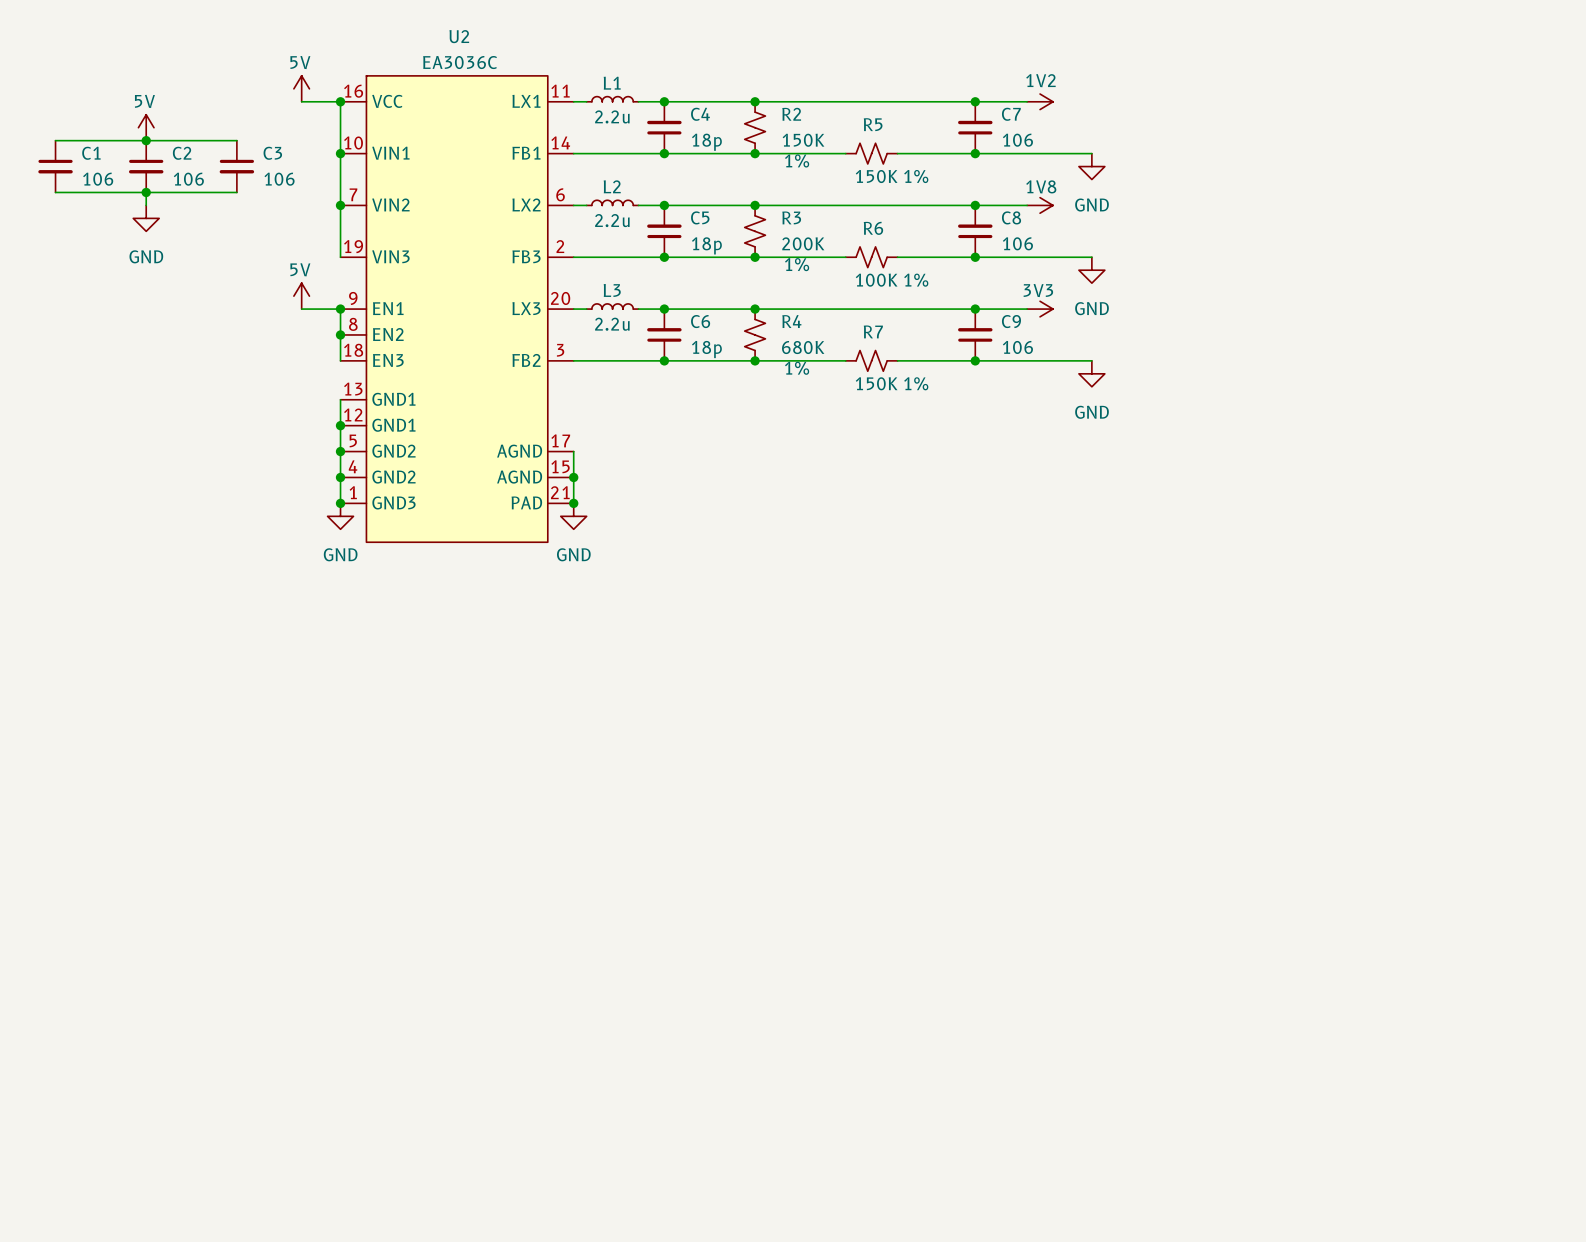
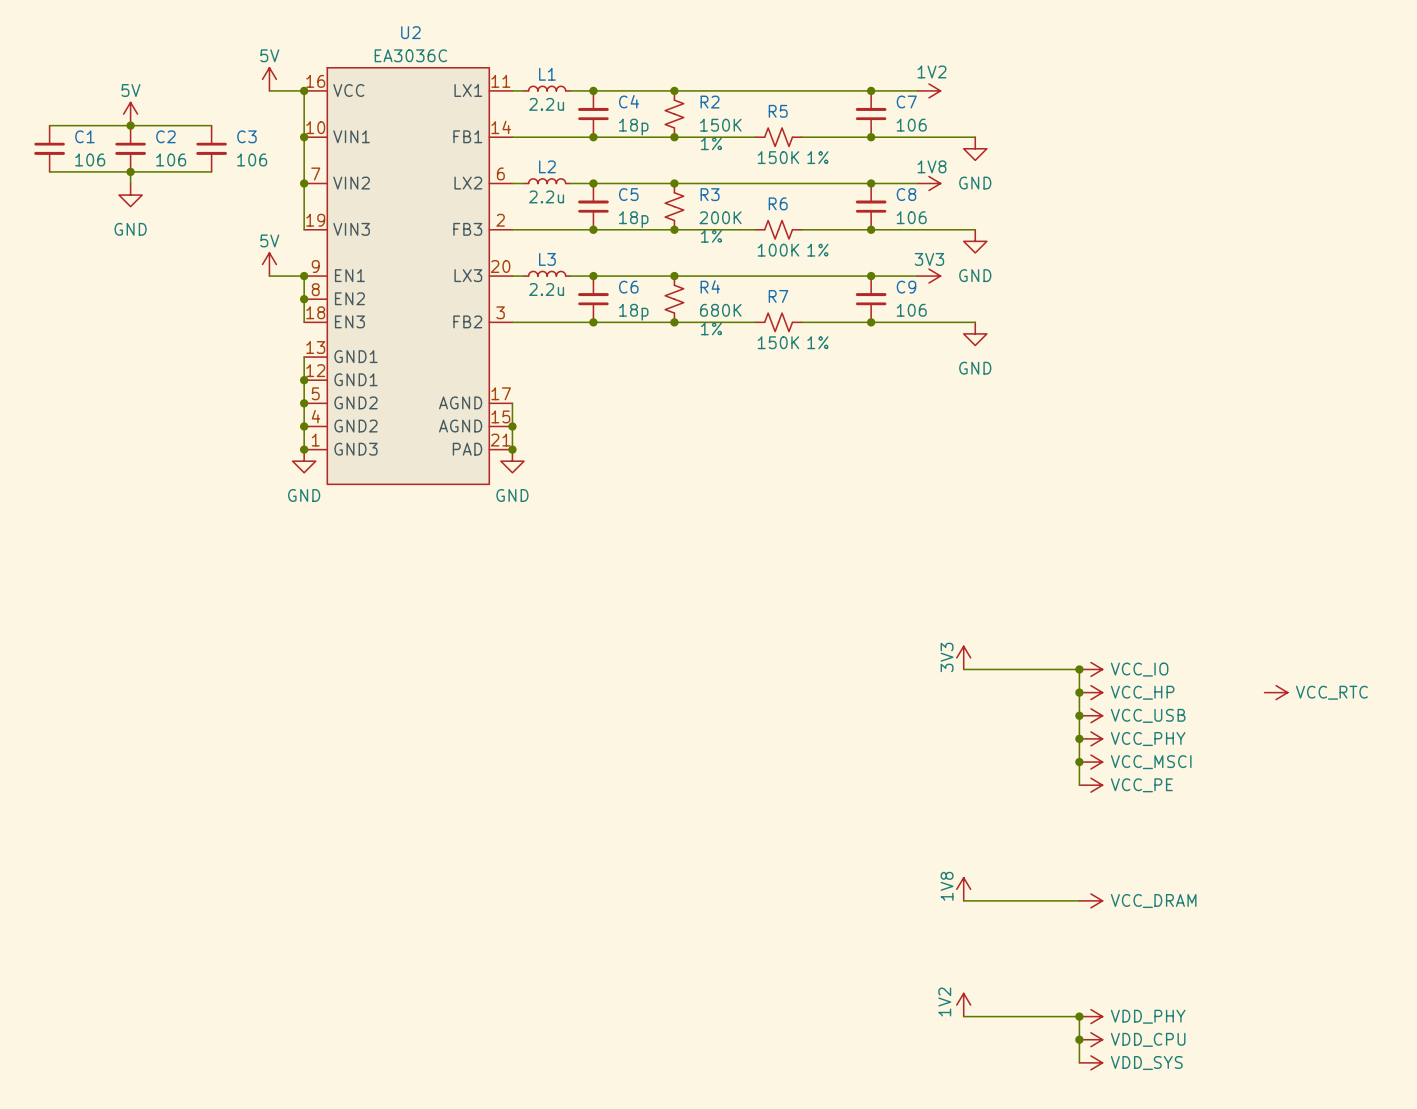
power symbol: none -> 3V3 (963, 657)
wire: none -> (963, 669) (1079, 669) (1079, 785)
junction: none -> (1079, 669)
power symbol: none -> VCC_IO (1090, 669)
junction: none -> (1079, 692)
power symbol: none -> VCC_HP (1090, 692)
power symbol: none -> VCC_RTC (1276, 692)
junction: none -> (1079, 715)
power symbol: none -> VCC_USB (1090, 715)
junction: none -> (1079, 738)
power symbol: none -> VCC_PHY (1090, 738)
junction: none -> (1079, 762)
power symbol: none -> VCC_MSCI (1090, 762)
power symbol: none -> VCC_PE (1090, 785)
power symbol: none -> 1V8 (963, 889)
wire: none -> (963, 900) (1079, 900)
power symbol: none -> VCC_DRAM (1090, 900)
power symbol: none -> 1V2 (963, 1005)
wire: none -> (963, 1016) (1079, 1016) (1079, 1062)
junction: none -> (1079, 1016)
power symbol: none -> VDD_PHY (1090, 1016)
junction: none -> (1079, 1039)
power symbol: none -> VDD_CPU (1090, 1039)
power symbol: none -> VDD_SYS (1090, 1062)

